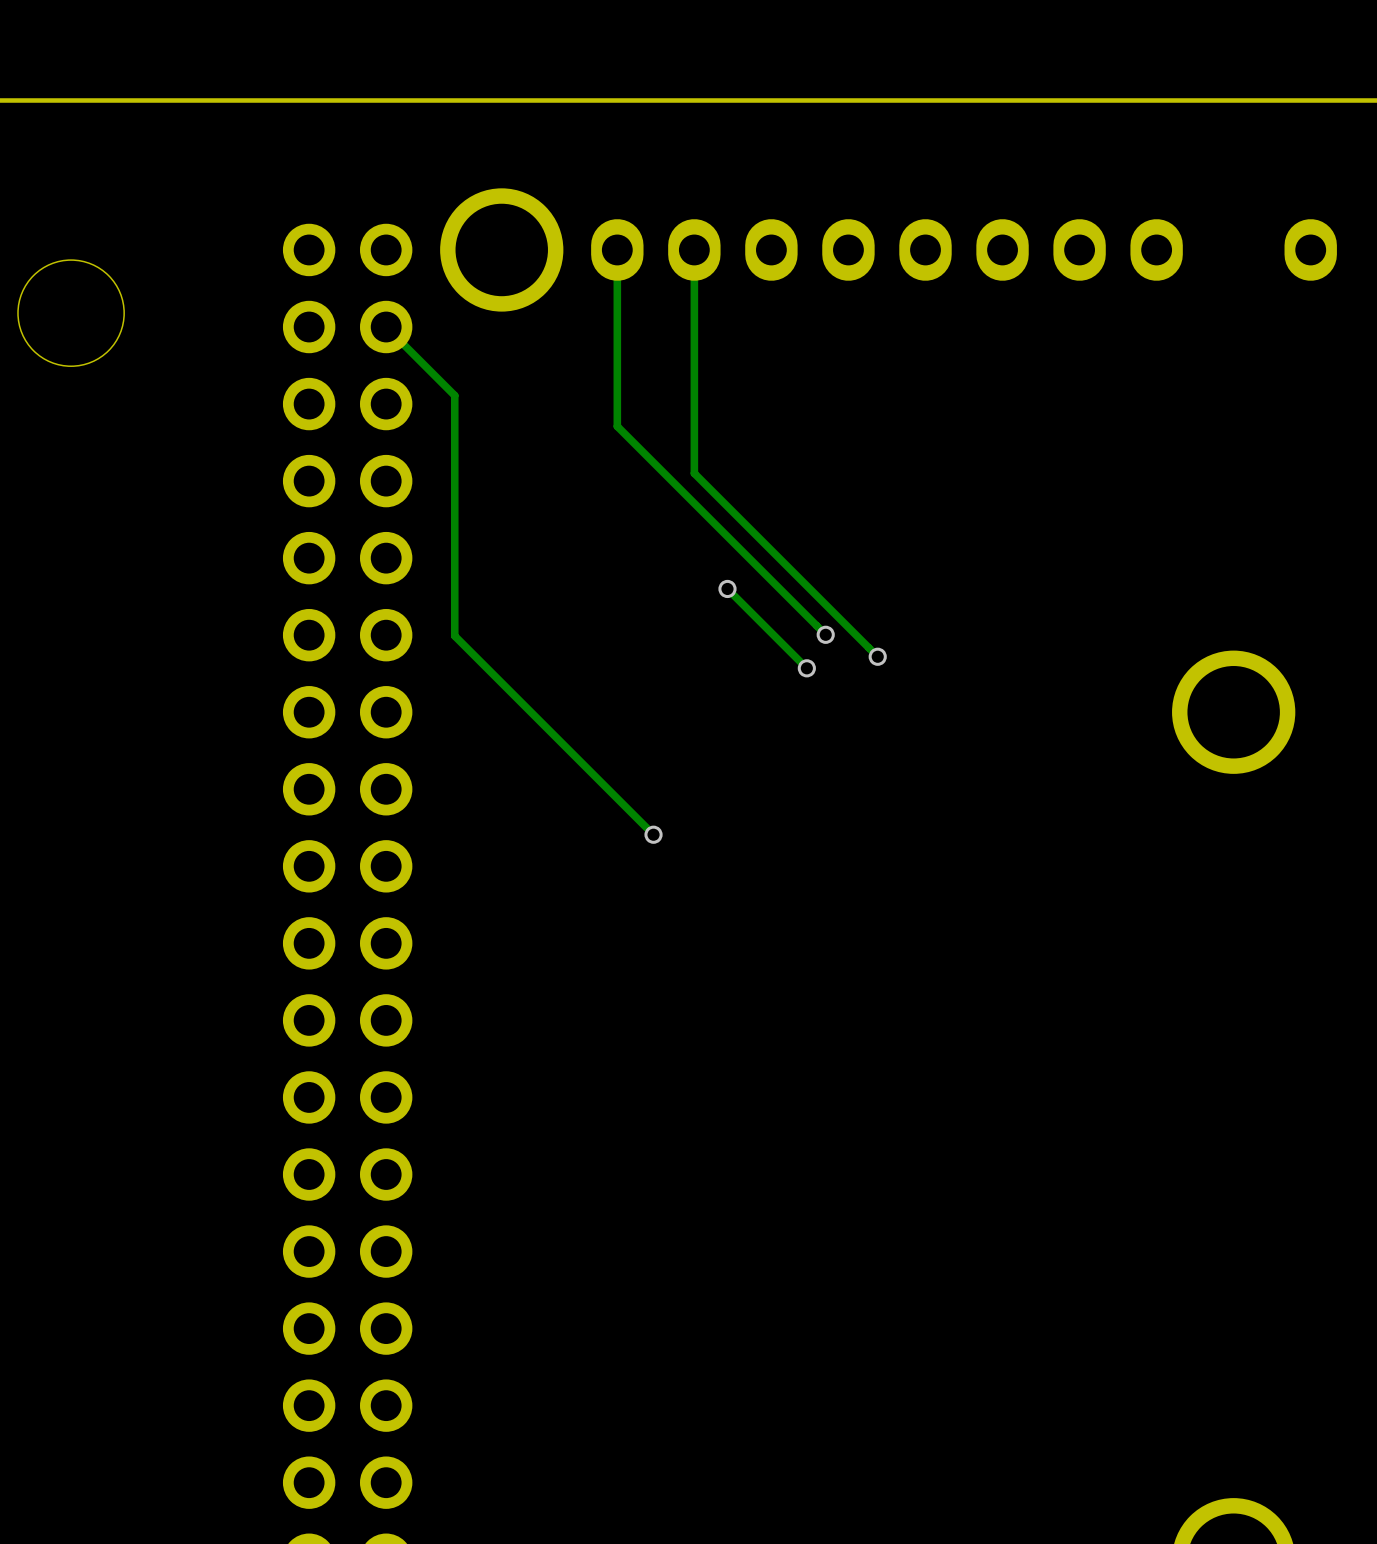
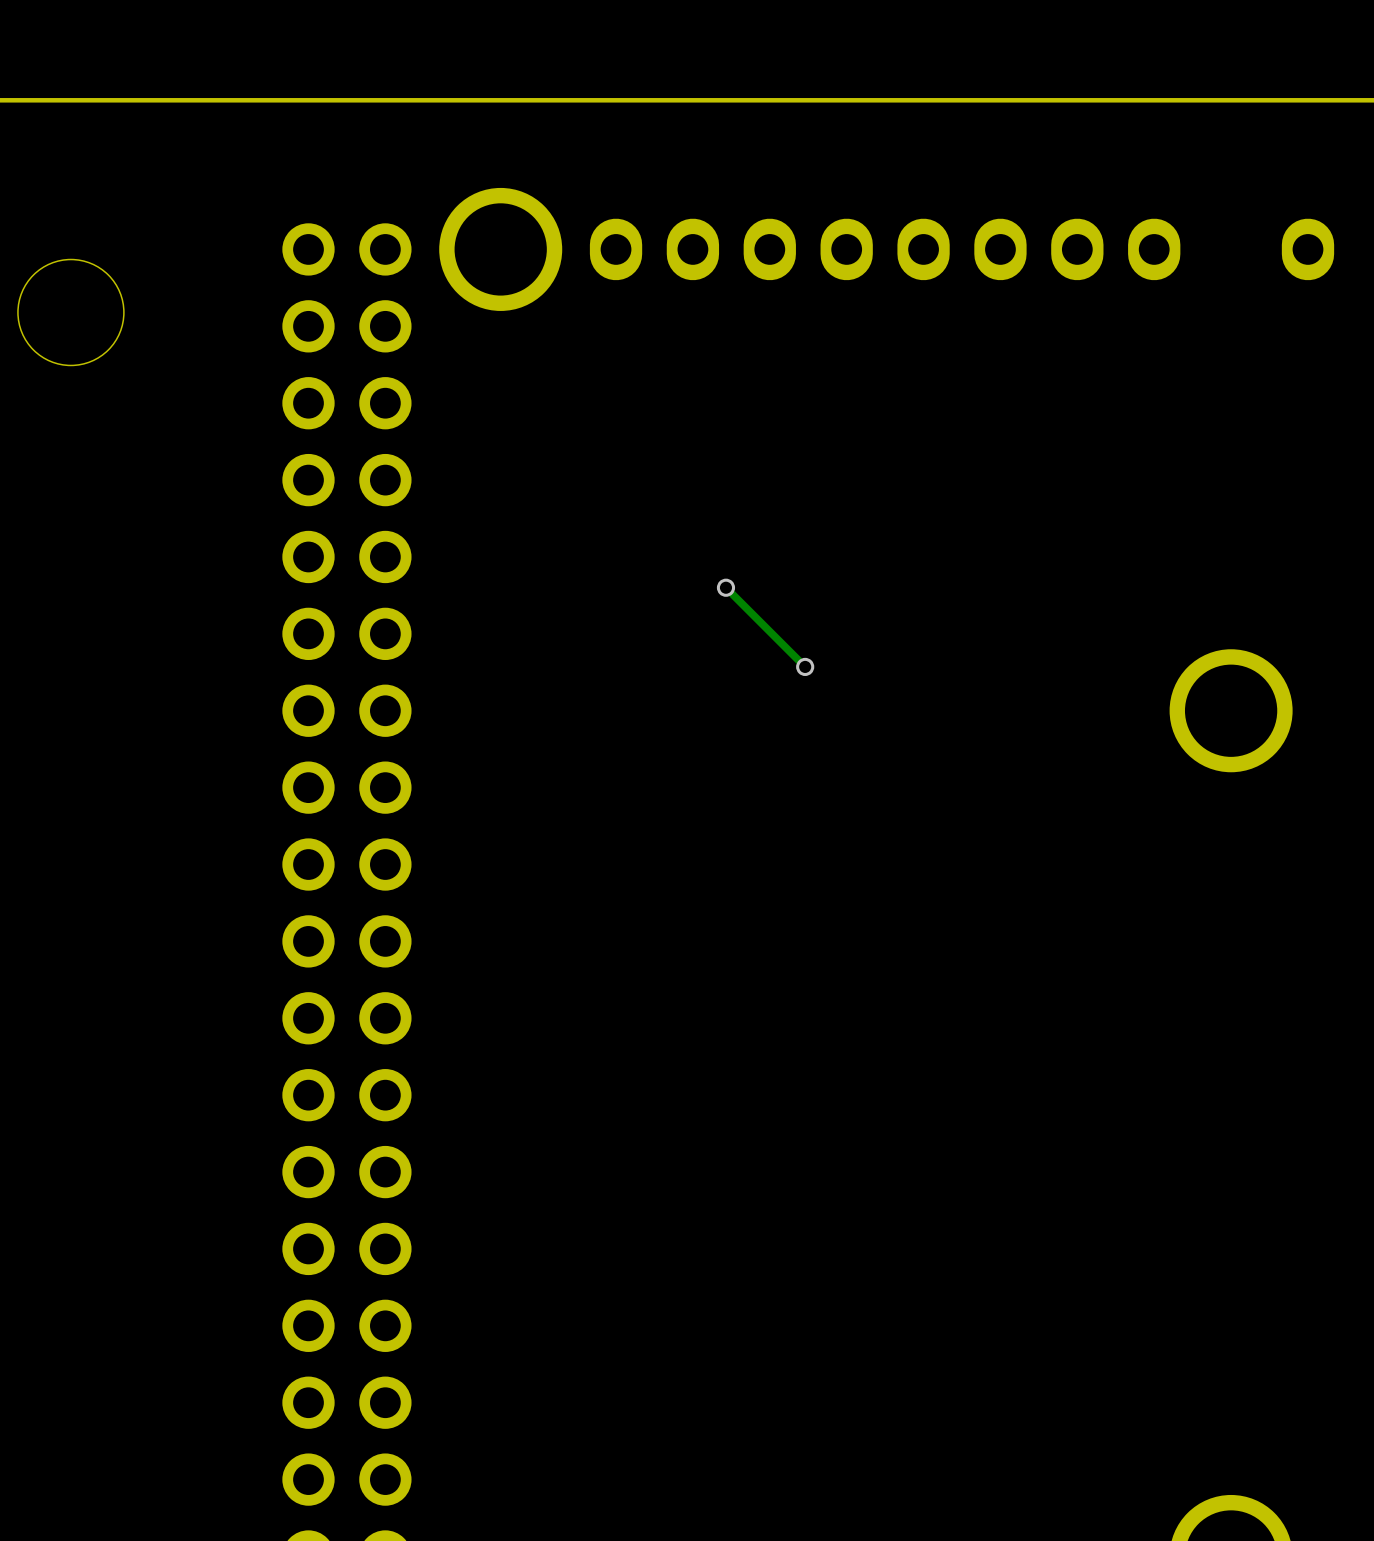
track: (617, 249) (617, 426) (825, 634) -> none
track: (694, 249) (694, 473) (877, 656) -> none
track: (386, 327) (454, 395) (454, 635) (653, 834) -> none
via: (825, 634) -> none
via: (877, 656) -> none
via: (653, 834) -> none

